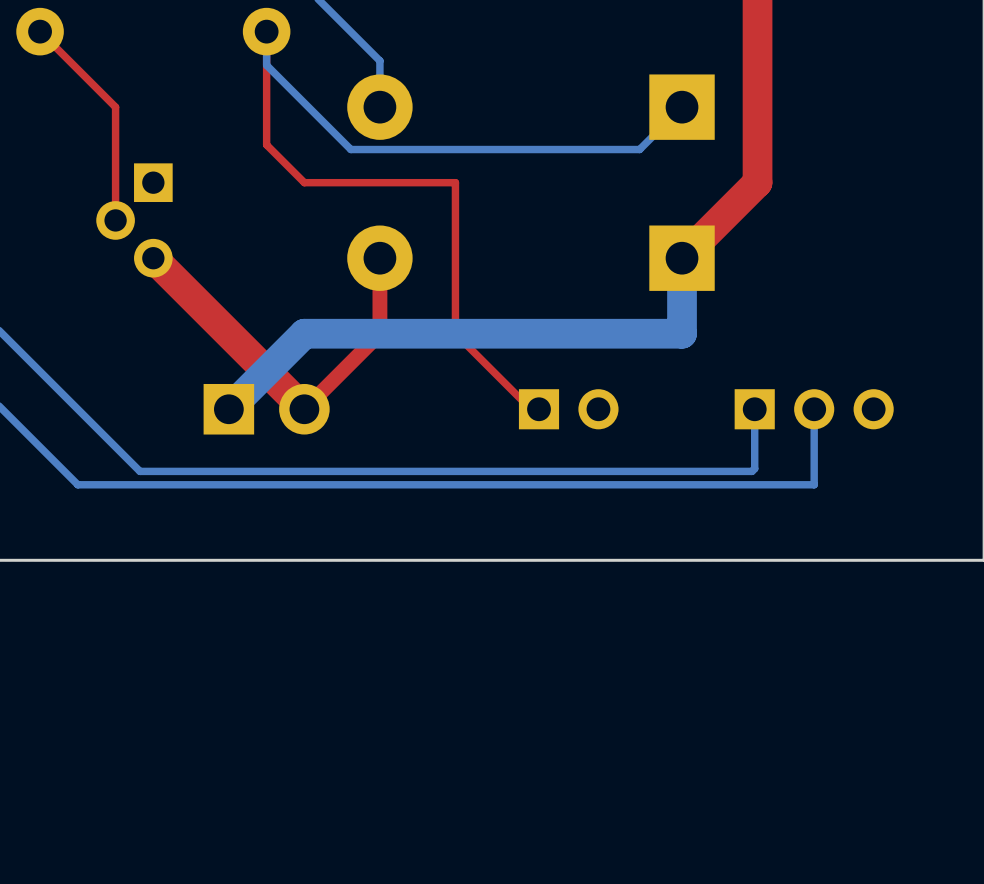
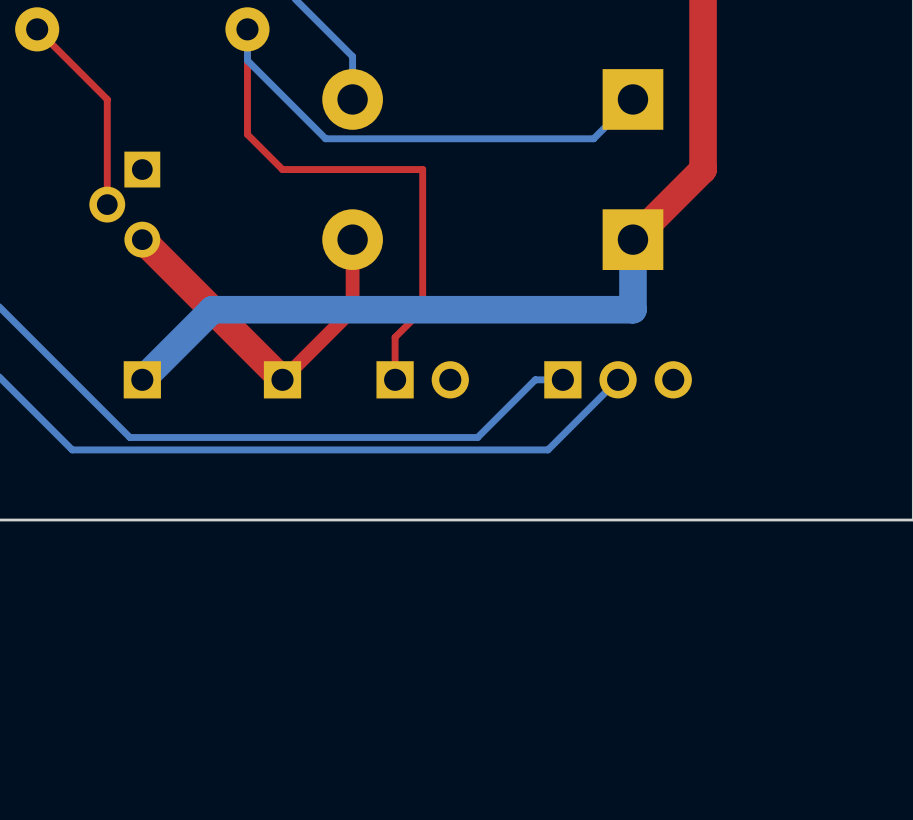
bottom track: (304, 333) (228, 409) -> (282, 309) (212, 309) (142, 379)
top track: (455, 333) (530, 409) (539, 409) -> (422, 309) (395, 337) (395, 379)
part: none -> (142, 379)
part: (266, 409) -> none
part: none -> (282, 379)
part position: (568, 409) -> (422, 379)
bottom track: (754, 409) (754, 468) (752, 471) (514, 471) -> (562, 379) (535, 379) (477, 437)
bottom track: (814, 409) (814, 484) (590, 484) -> (618, 379) (547, 449)
part position: (814, 409) -> (618, 379)

